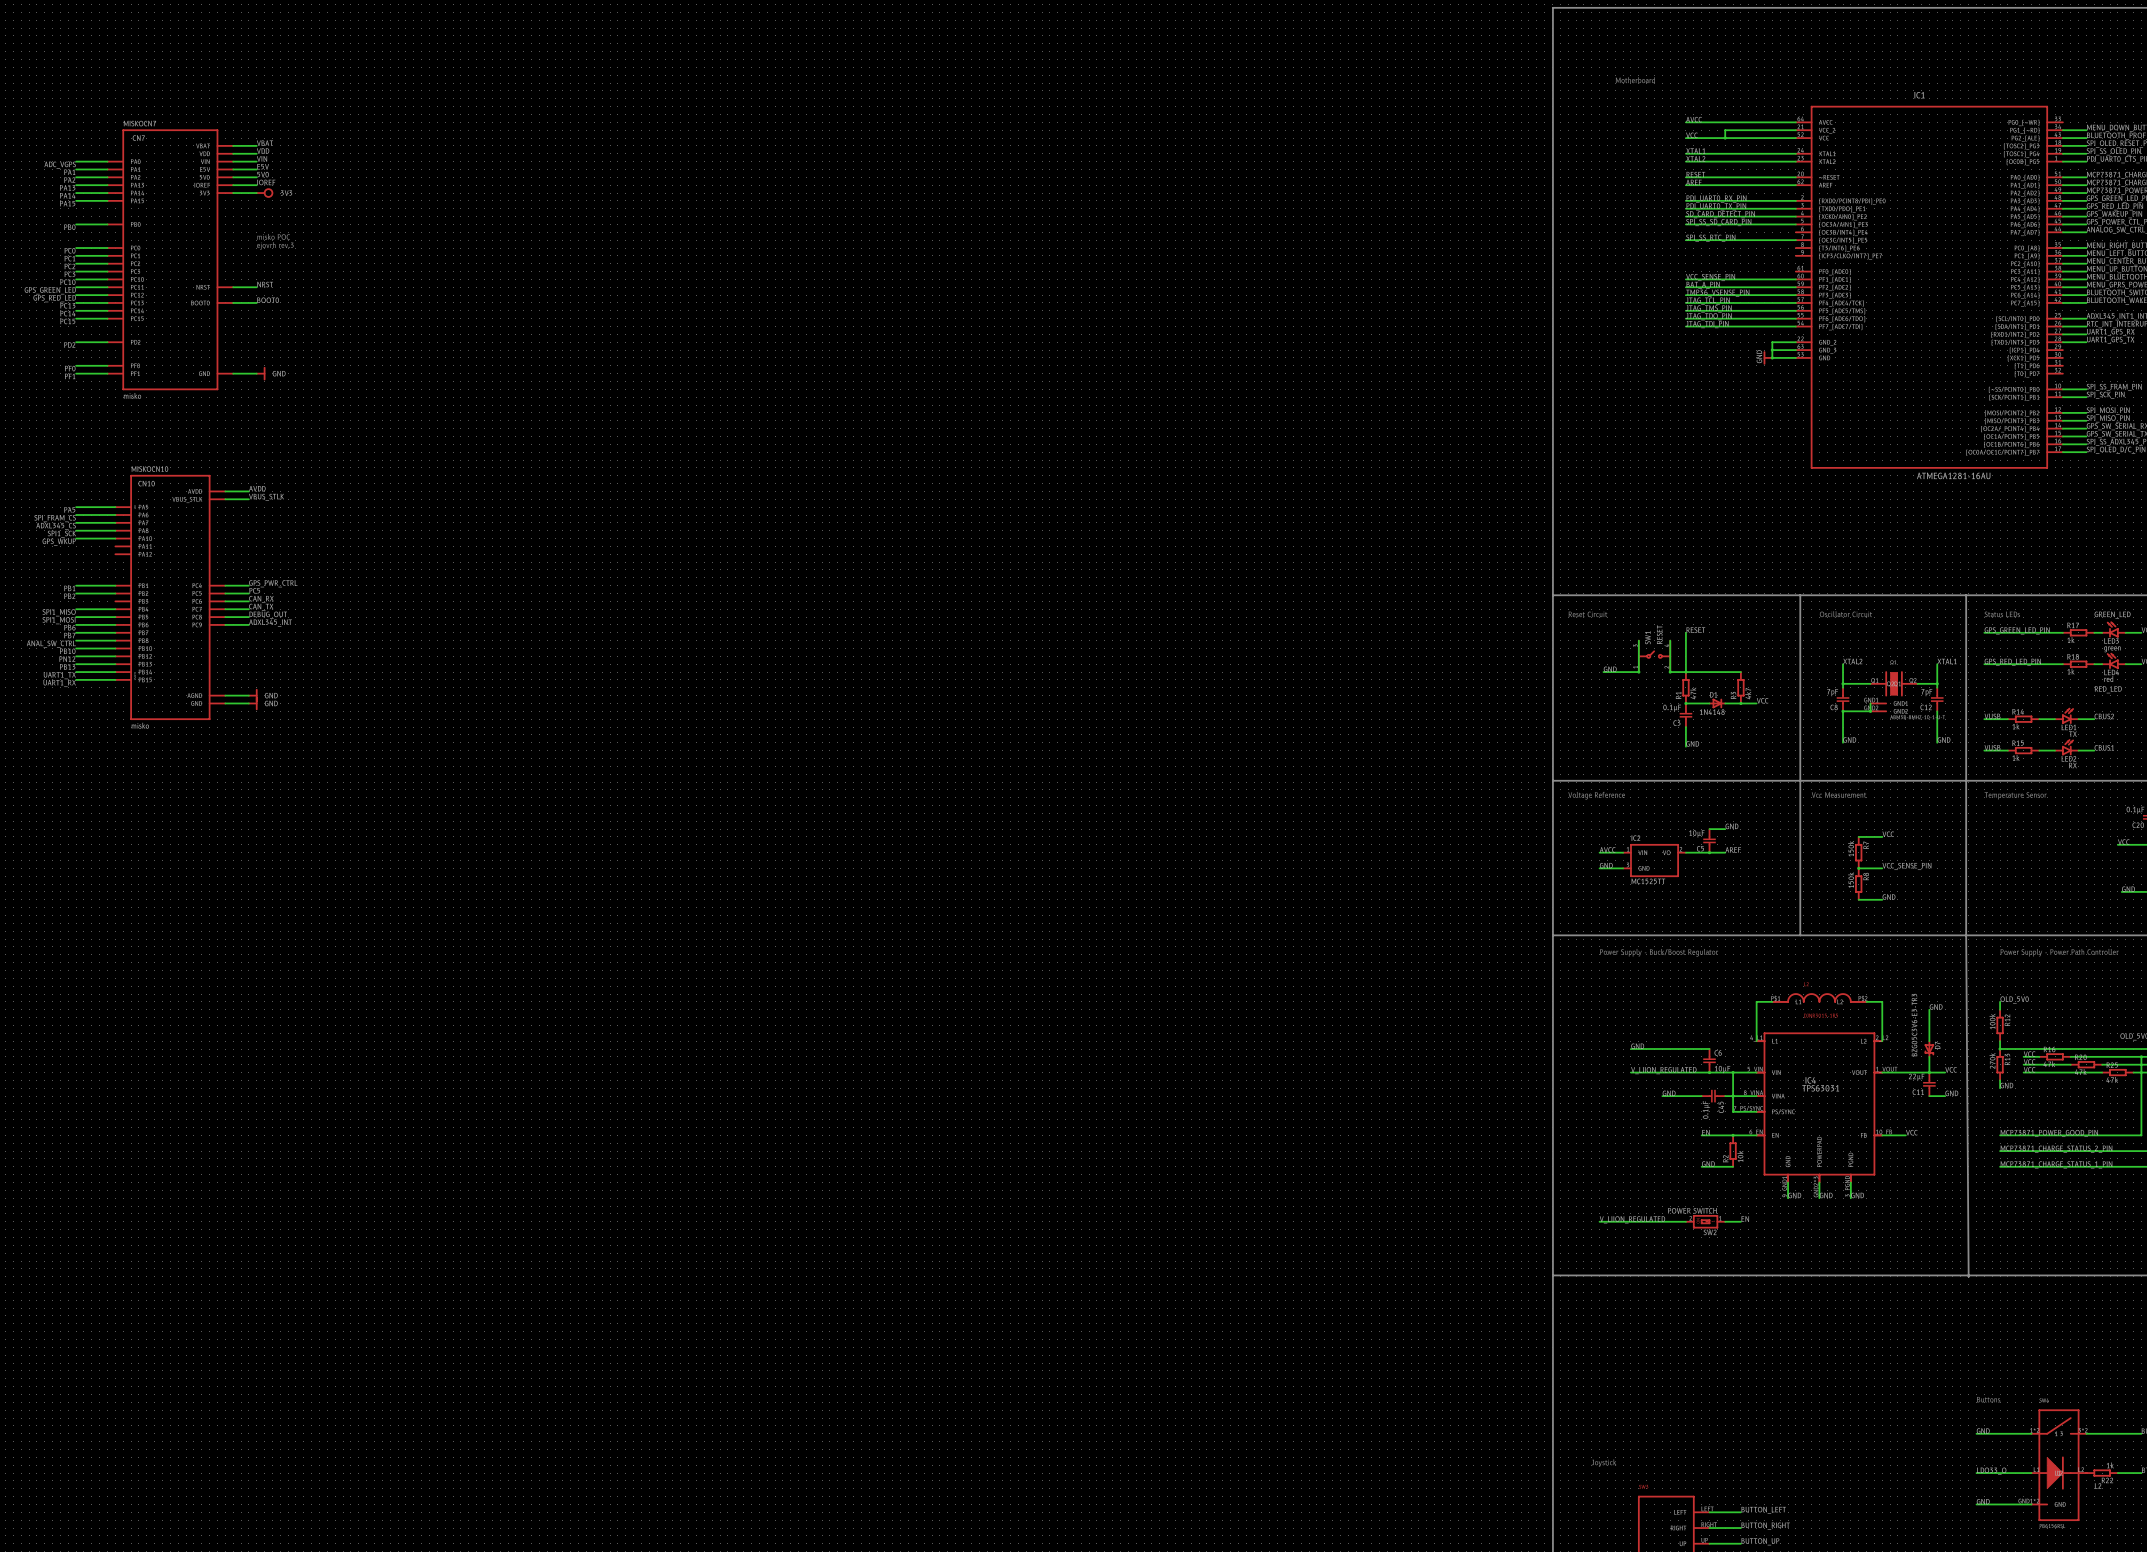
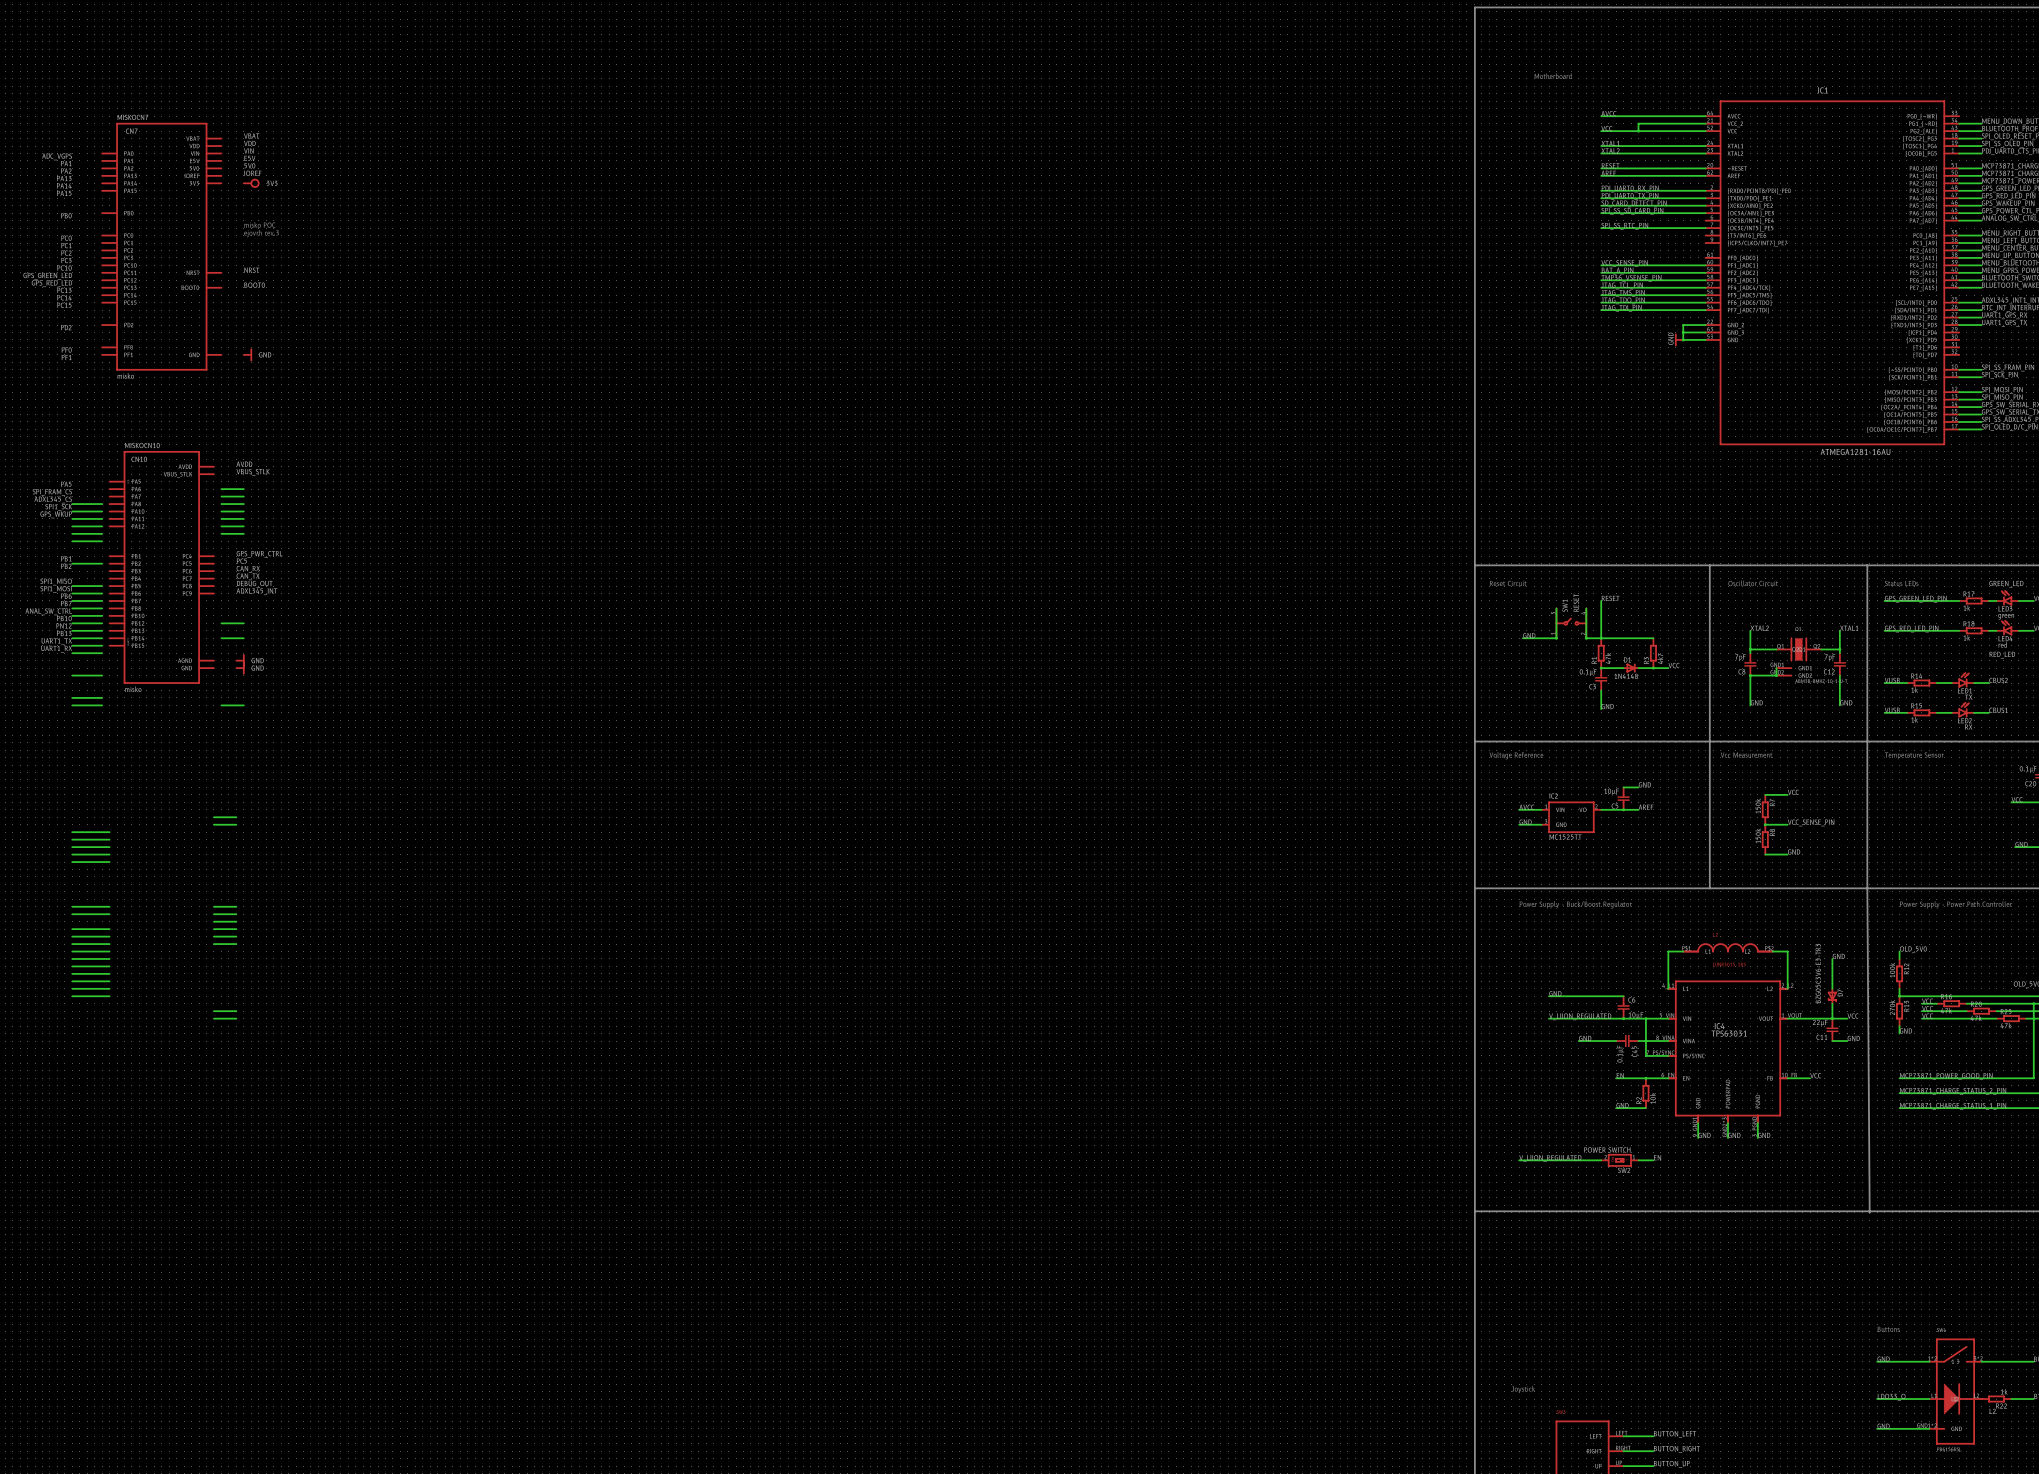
wire: (233, 145) (256, 145) -> none
wire: (233, 153) (256, 153) -> none
wire: (76, 161) (107, 161) -> none
wire: (233, 161) (256, 161) -> none
wire: (76, 169) (107, 169) -> none
wire: (233, 169) (256, 169) -> none
wire: (76, 177) (107, 177) -> none
wire: (233, 177) (256, 177) -> none
wire: (76, 185) (107, 185) -> none
wire: (233, 185) (256, 185) -> none
wire: (76, 193) (107, 193) -> none
wire: (233, 193) (256, 193) -> none
wire: (76, 200) (107, 200) -> none
wire: (76, 224) (107, 224) -> none
wire: (76, 248) (107, 248) -> none
wire: (76, 255) (107, 255) -> none
wire: (76, 263) (107, 263) -> none
wire: (76, 271) (107, 271) -> none
wire: (76, 279) (107, 279) -> none
wire: (76, 287) (107, 287) -> none
wire: (233, 287) (256, 287) -> none
wire: (76, 295) (107, 295) -> none
wire: (76, 302) (107, 302) -> none
wire: (233, 302) (256, 302) -> none
wire: (76, 310) (107, 310) -> none
wire: (76, 318) (107, 318) -> none
wire: (76, 342) (107, 342) -> none
wire: (76, 365) (107, 365) -> none
wire: (76, 373) (107, 373) -> none
wire: (233, 373) (256, 373) -> none
wire: (225, 491) (248, 491) -> (221, 489) (243, 489)
wire: (225, 499) (248, 499) -> none
wire: (76, 507) (115, 507) -> none
wire: (76, 515) (115, 515) -> none
wire: (76, 522) (115, 522) -> none
wire: (107, 530) (115, 530) -> none
wire: (107, 538) (115, 538) -> none
wire: none -> (72, 518) (102, 518)
wire: none -> (72, 526) (102, 526)
wire: none -> (72, 533) (102, 533)
wire: none -> (72, 541) (102, 541)
wire: (76, 585) (115, 585) -> none
wire: (225, 585) (248, 585) -> (221, 496) (243, 496)
wire: (107, 593) (115, 593) -> none
wire: (225, 593) (248, 593) -> (221, 504) (243, 504)
wire: (225, 601) (248, 601) -> (221, 511) (243, 511)
wire: (76, 609) (115, 609) -> none
wire: (225, 609) (248, 609) -> (221, 518) (243, 518)
wire: (107, 617) (115, 617) -> none
wire: (225, 617) (248, 617) -> (221, 526) (243, 526)
wire: (107, 624) (115, 624) -> none
wire: (225, 624) (248, 624) -> (221, 533) (243, 533)
wire: (107, 632) (115, 632) -> none
wire: (107, 640) (115, 640) -> none
wire: (107, 648) (115, 648) -> none
wire: (107, 656) (115, 656) -> none
wire: (107, 664) (115, 664) -> none
wire: (107, 672) (115, 672) -> none
wire: none -> (221, 638) (243, 638)
wire: (107, 679) (115, 679) -> none
wire: none -> (72, 653) (102, 653)
wire: (225, 695) (248, 695) -> (221, 705) (243, 705)
wire: (225, 703) (248, 703) -> (221, 623) (243, 623)
wire: none -> (72, 675) (102, 675)
wire: none -> (72, 697) (102, 697)
wire: none -> (72, 705) (102, 705)
wire: none -> (213, 817) (236, 817)
wire: none -> (213, 824) (236, 824)
wire: none -> (72, 832) (109, 832)
wire: none -> (72, 839) (109, 839)
wire: none -> (72, 847) (109, 847)
wire: none -> (72, 854) (109, 854)
wire: none -> (72, 862) (109, 862)
wire: none -> (72, 906) (109, 906)
wire: none -> (213, 906) (236, 906)
wire: none -> (72, 914) (109, 914)
wire: none -> (213, 914) (236, 914)
wire: none -> (213, 921) (236, 921)
wire: none -> (72, 929) (109, 929)
wire: none -> (213, 929) (236, 929)
wire: none -> (72, 936) (109, 936)
wire: none -> (213, 936) (236, 936)
wire: none -> (72, 944) (109, 944)
wire: none -> (213, 944) (236, 944)
wire: none -> (72, 951) (109, 951)
wire: none -> (72, 958) (109, 958)
wire: none -> (72, 966) (109, 966)
wire: none -> (72, 973) (109, 973)
wire: none -> (72, 981) (109, 981)
wire: none -> (72, 988) (109, 988)
wire: none -> (72, 996) (109, 996)
wire: none -> (213, 1011) (236, 1011)
wire: none -> (213, 1018) (236, 1018)

